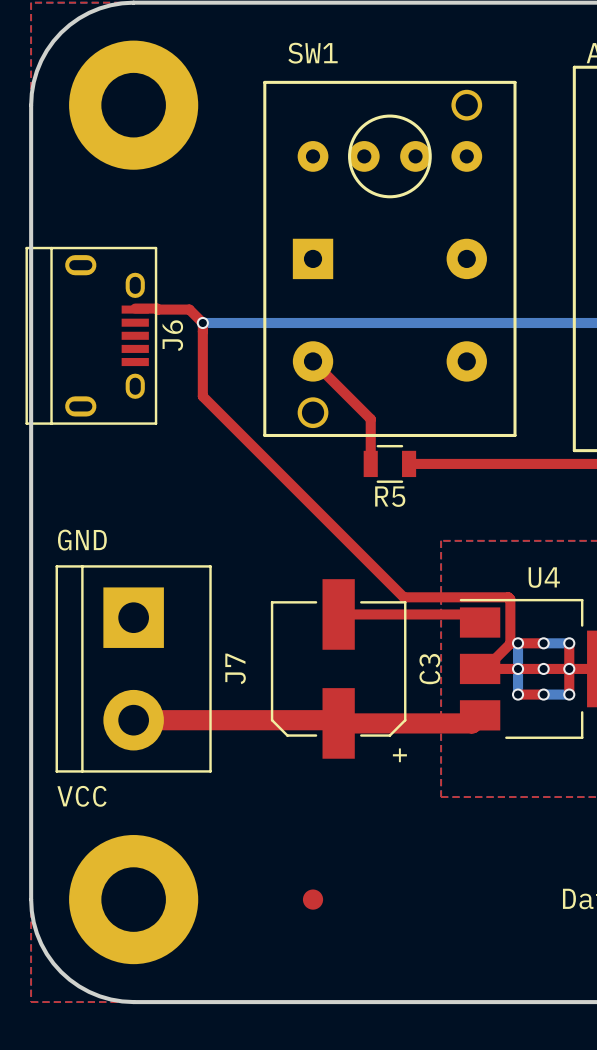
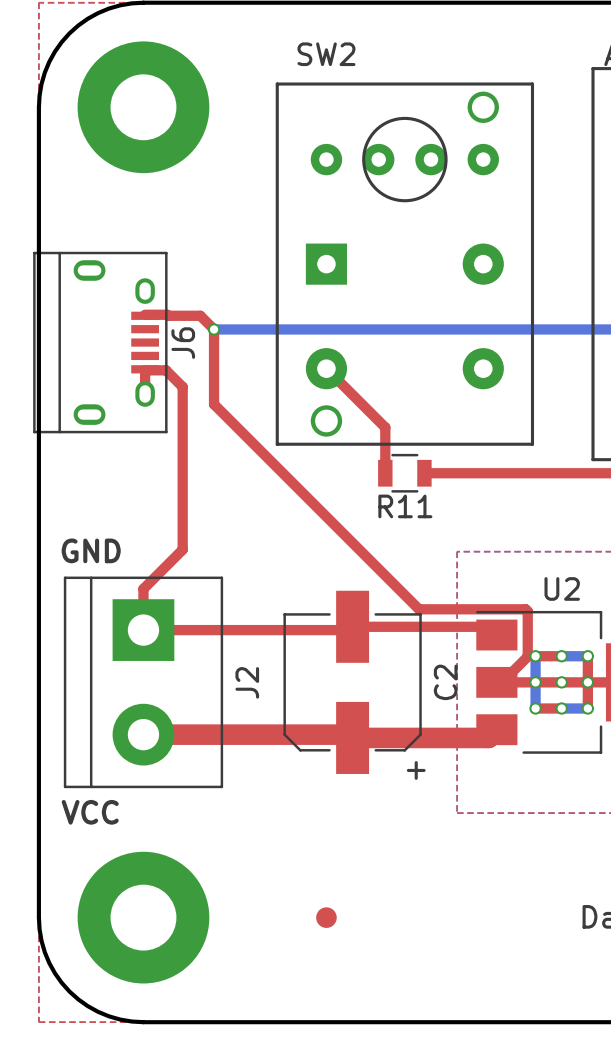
SW1 name: SW1 (312, 53) -> SW2 (326, 54)
top track: none -> (145, 394) (145, 370) (166, 370) (182, 386) (182, 549) (143, 588) (143, 630) (349, 630) (352, 626)
R5 name: R5 (390, 496) -> R11 (405, 506)
U4 name: U4 (544, 577) -> U2 (562, 588)
J7 name: J7 (235, 668) -> J2 (247, 682)
C3 name: C3 (429, 669) -> C2 (445, 682)

